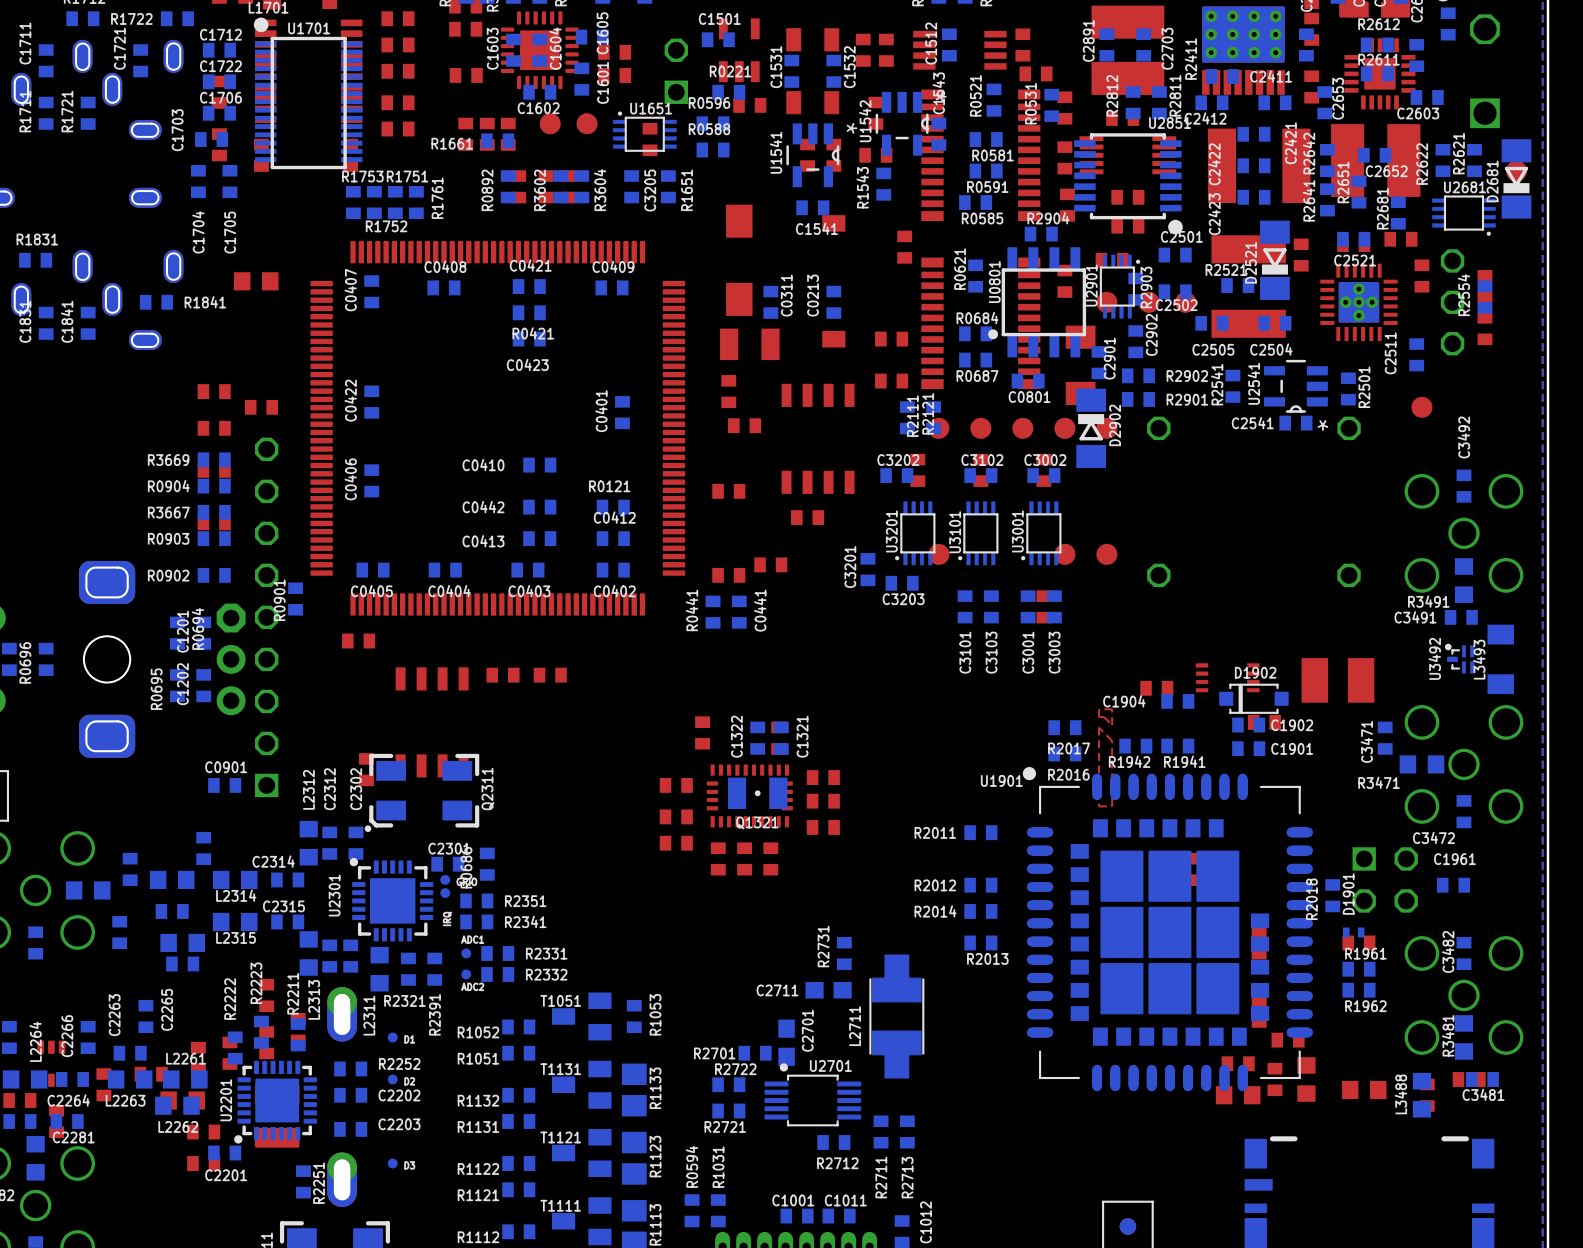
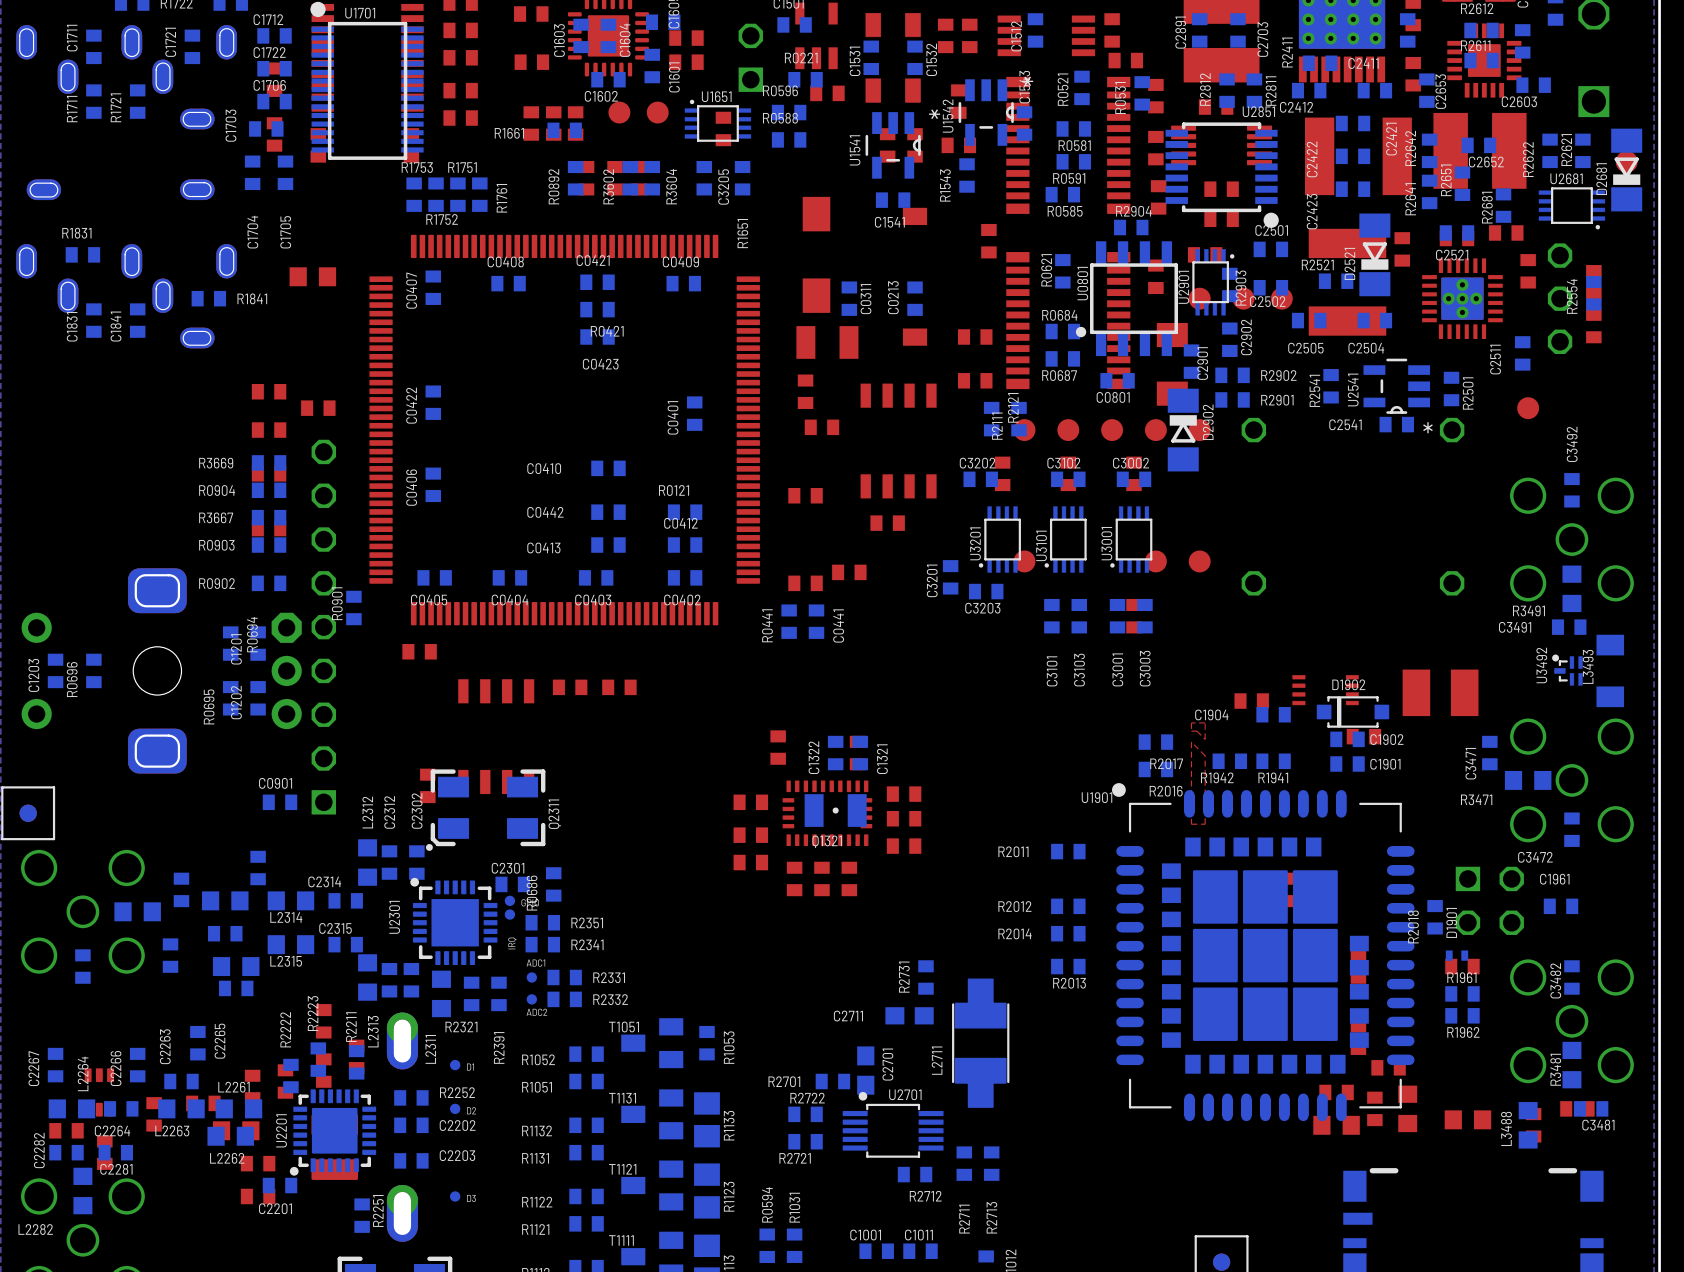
R1651 name position: R1651 (687, 190) -> R1651 (742, 233)

